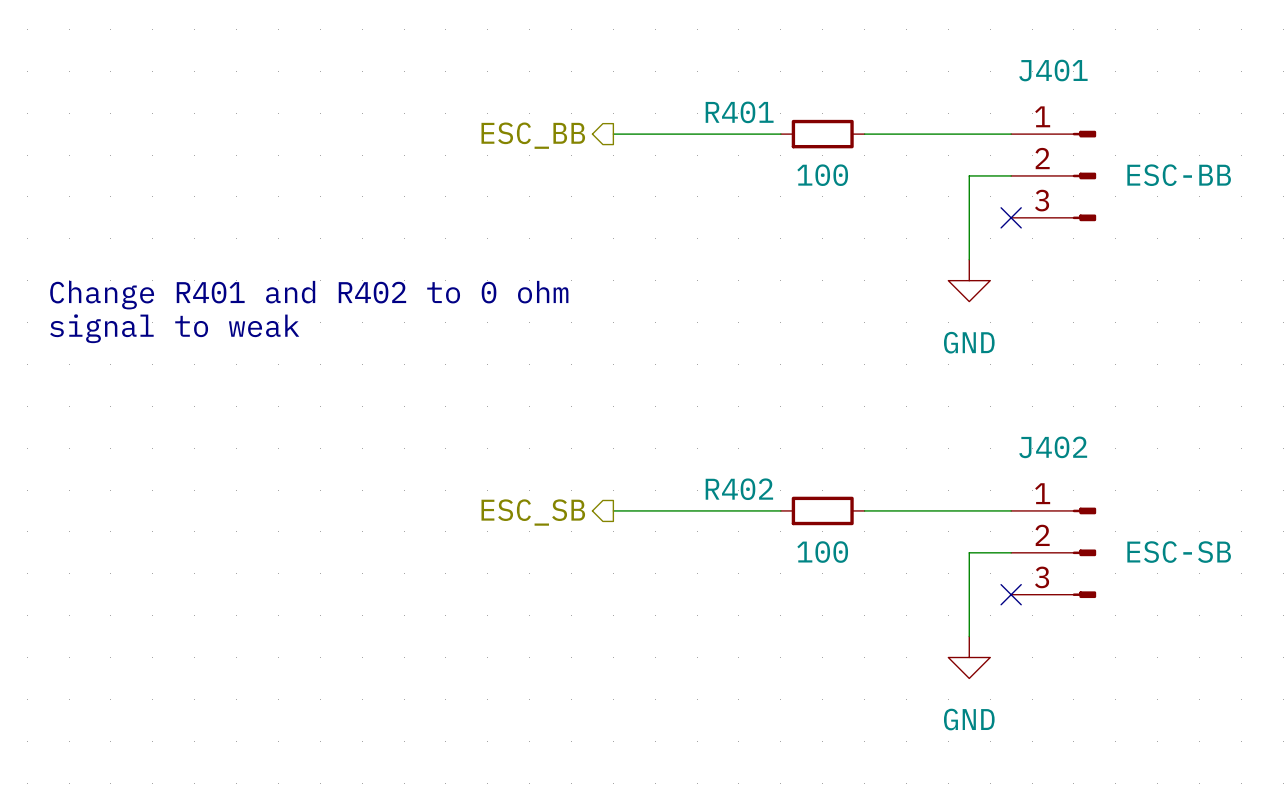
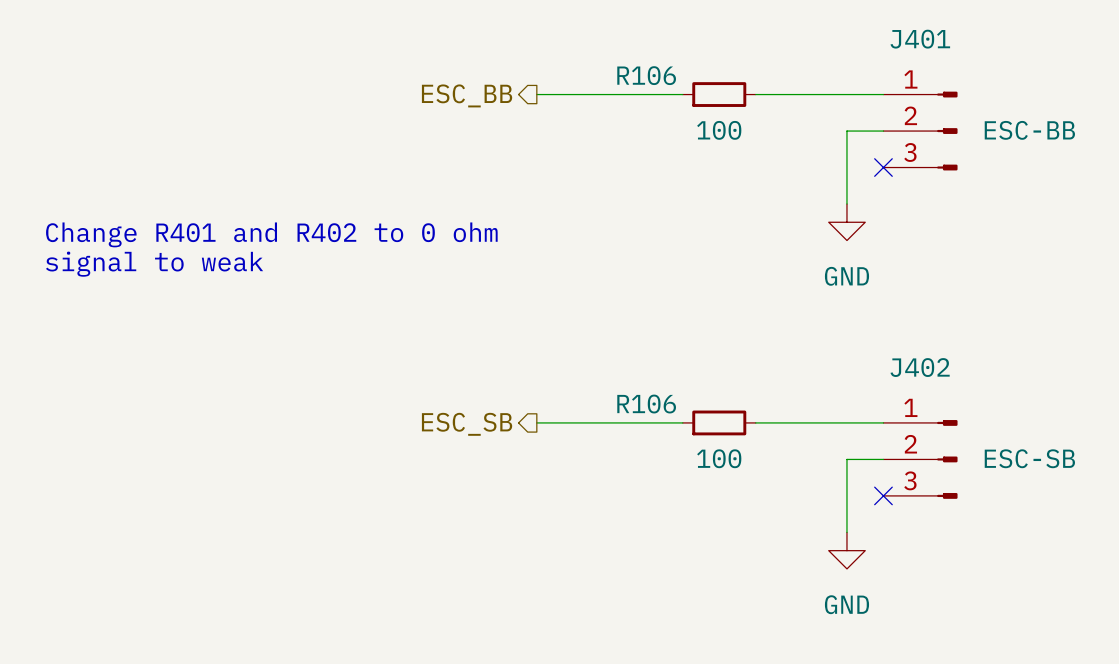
R401 name: R401 (739, 112) -> R106 (646, 75)
R402 name: R402 (739, 489) -> R106 (646, 404)

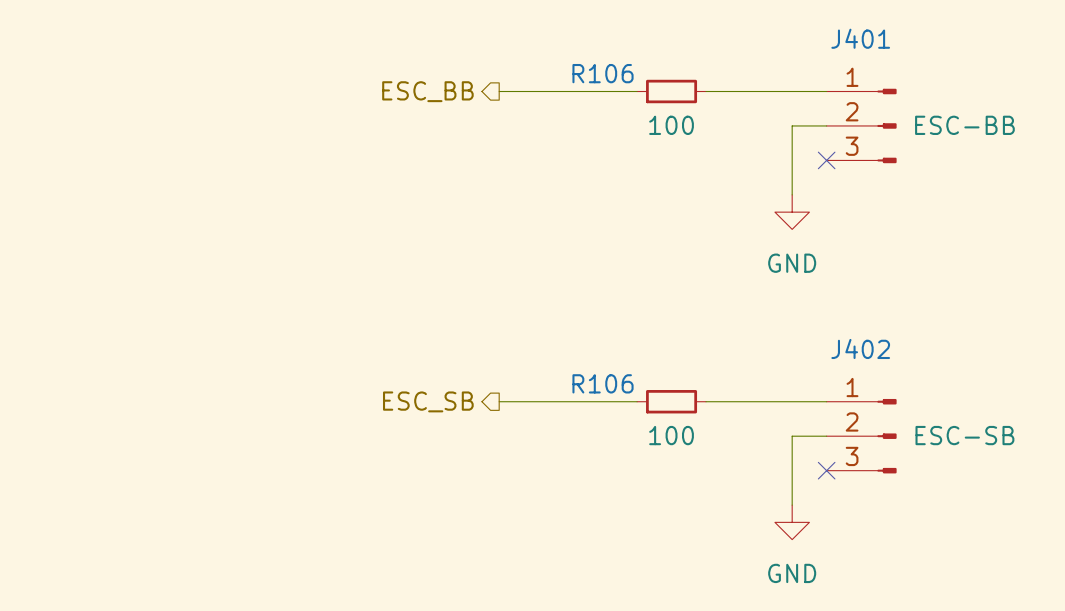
text: Change R401 and R402 to 0 ohm (271, 234) -> none
text: signal to weak (154, 264) -> none

